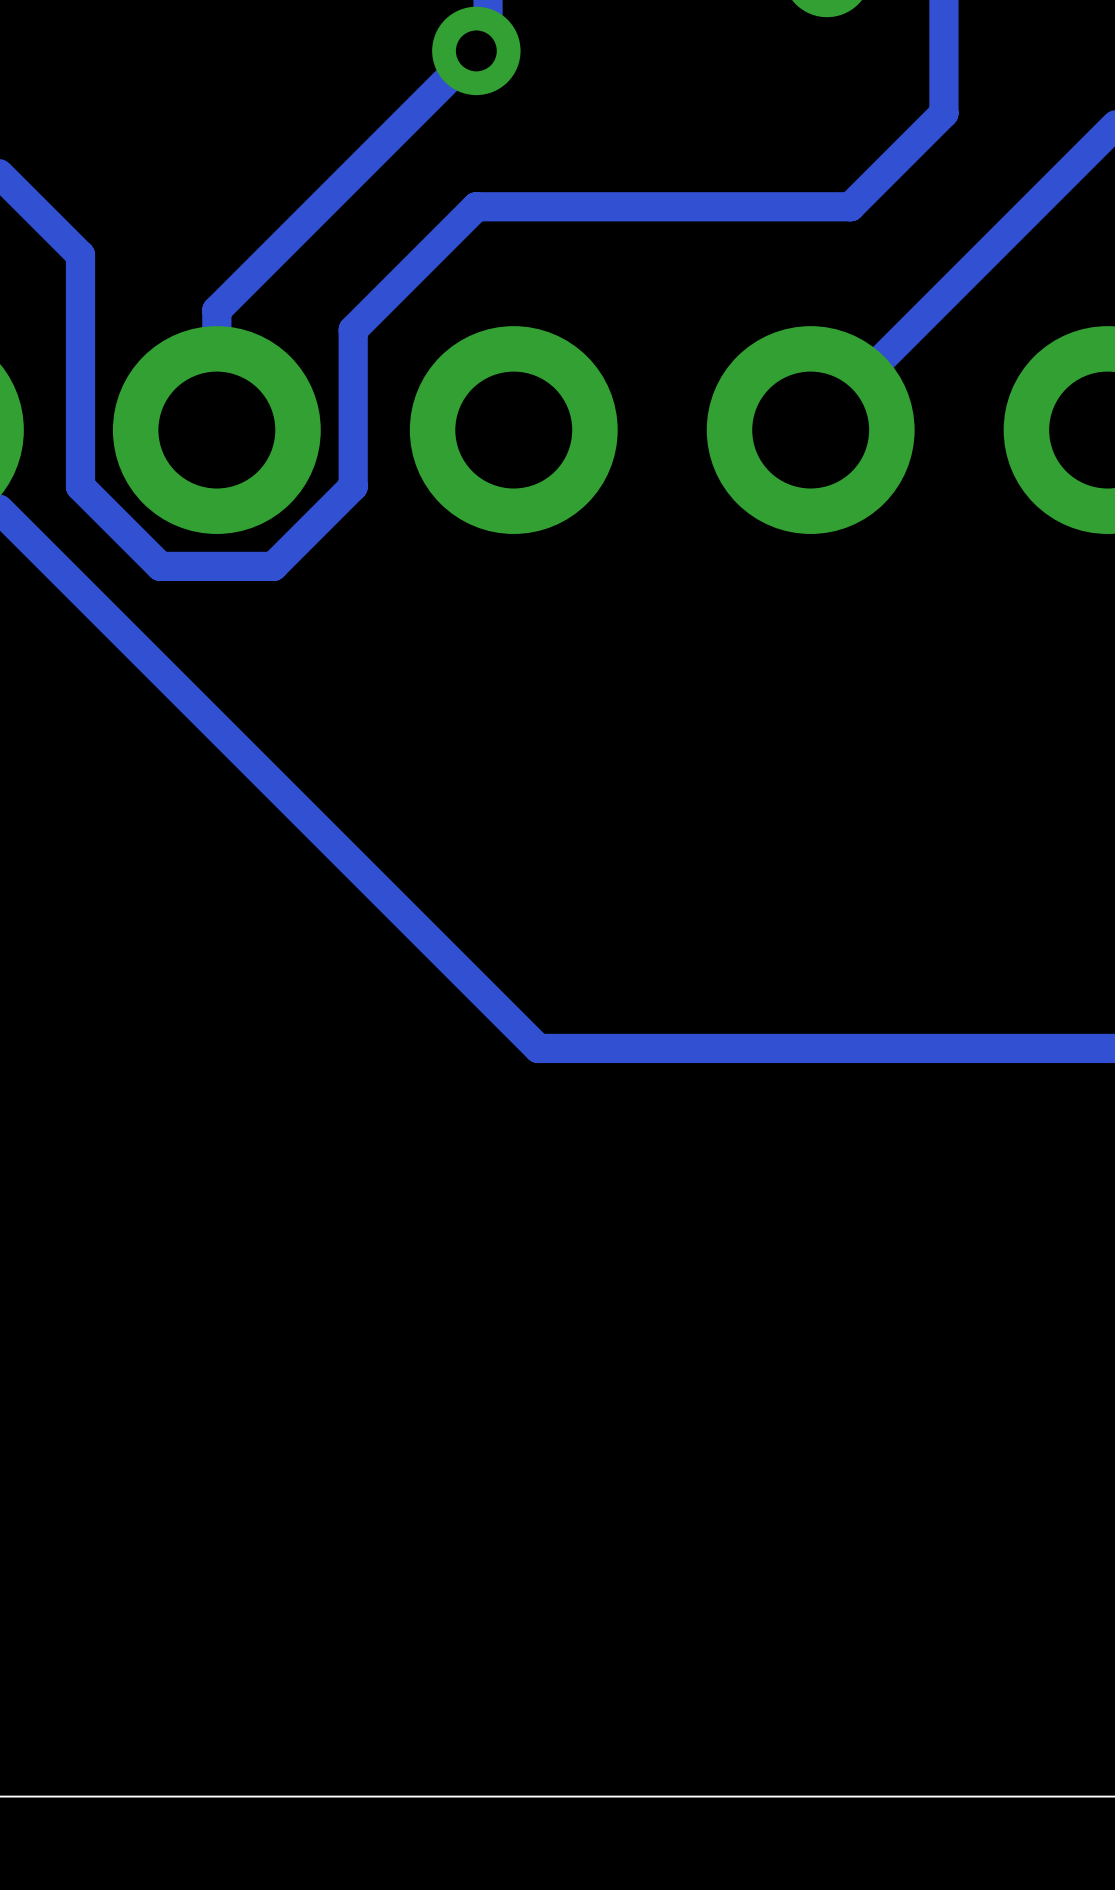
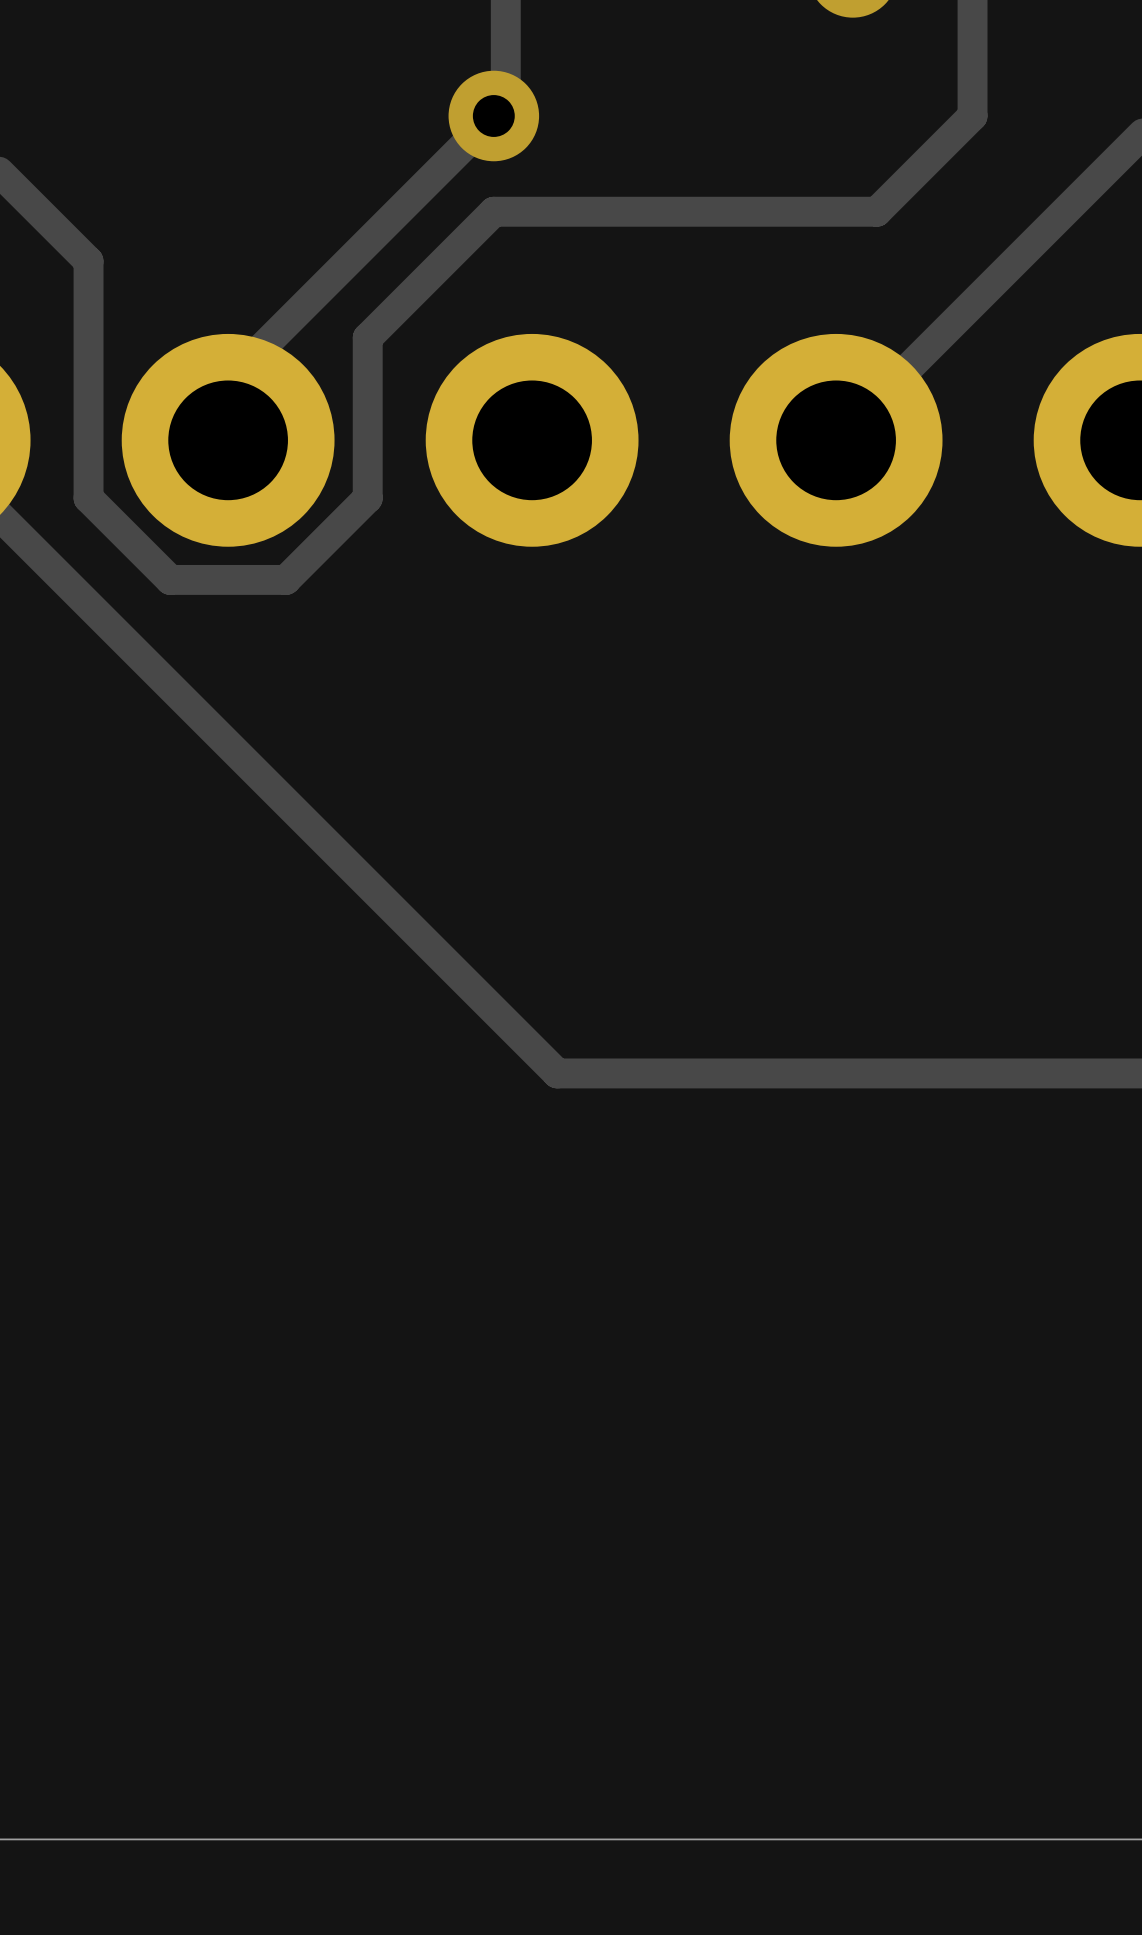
track: (488, 39) (216, 310) (216, 372) -> (505, 40) (505, 104) (228, 381)
via position: (476, 50) -> (493, 116)

